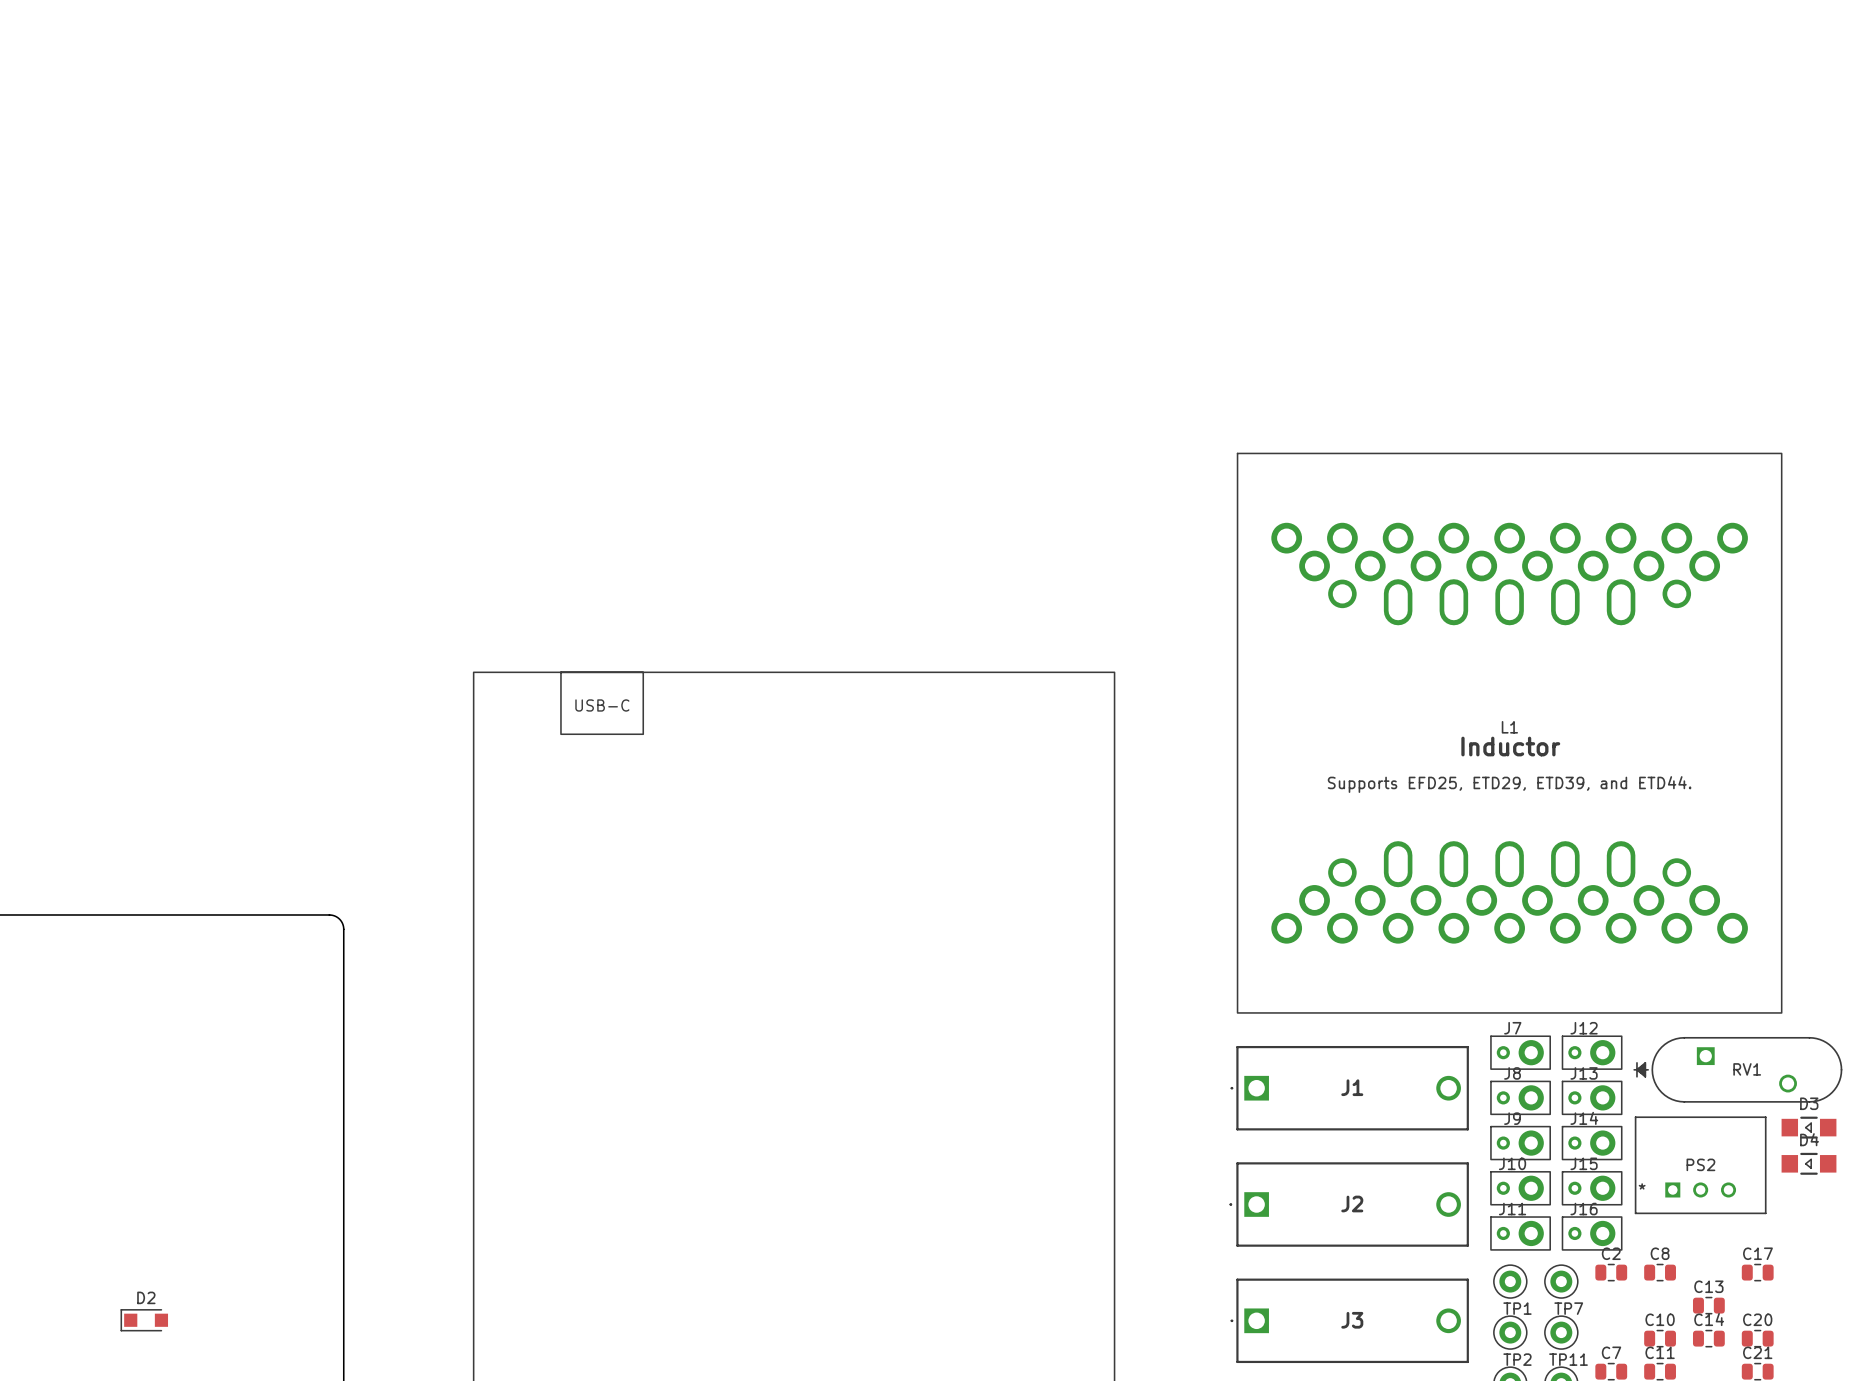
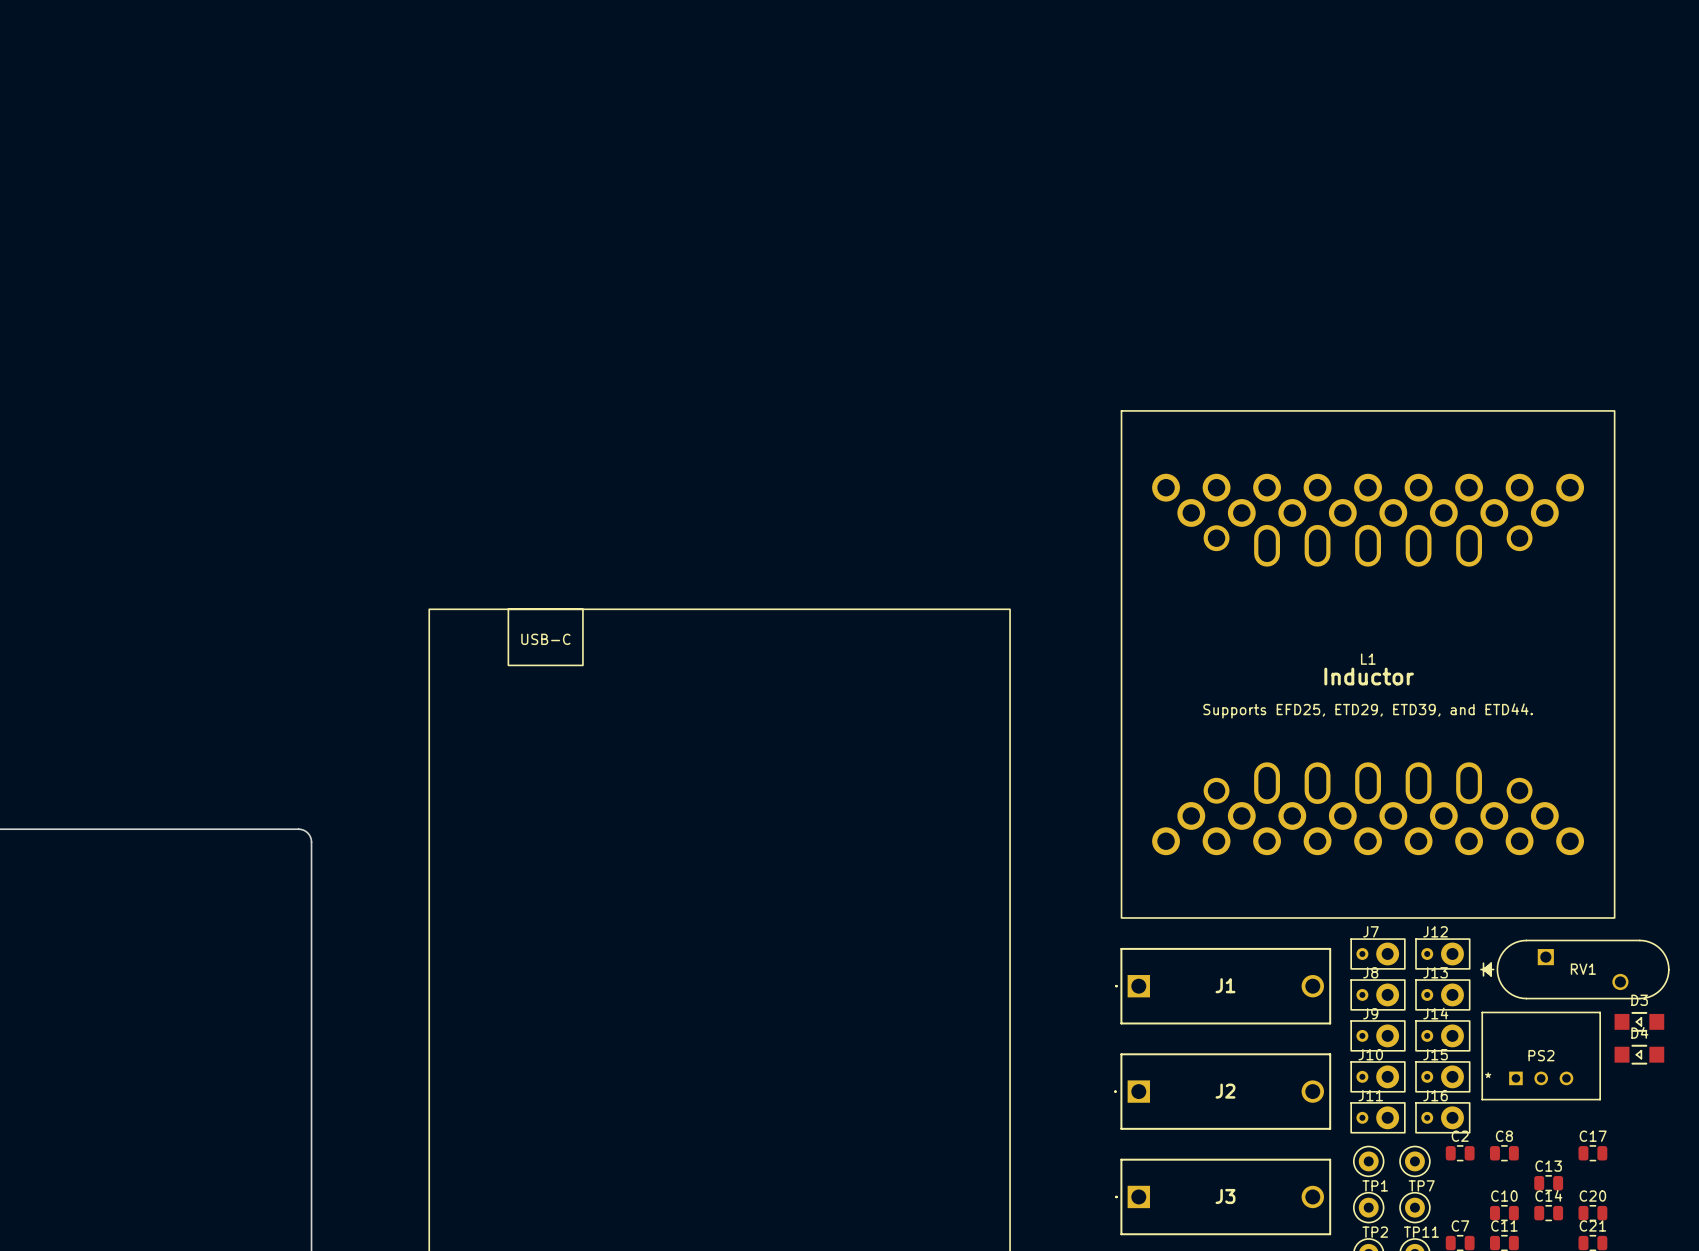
D2: (144, 1320) -> none

